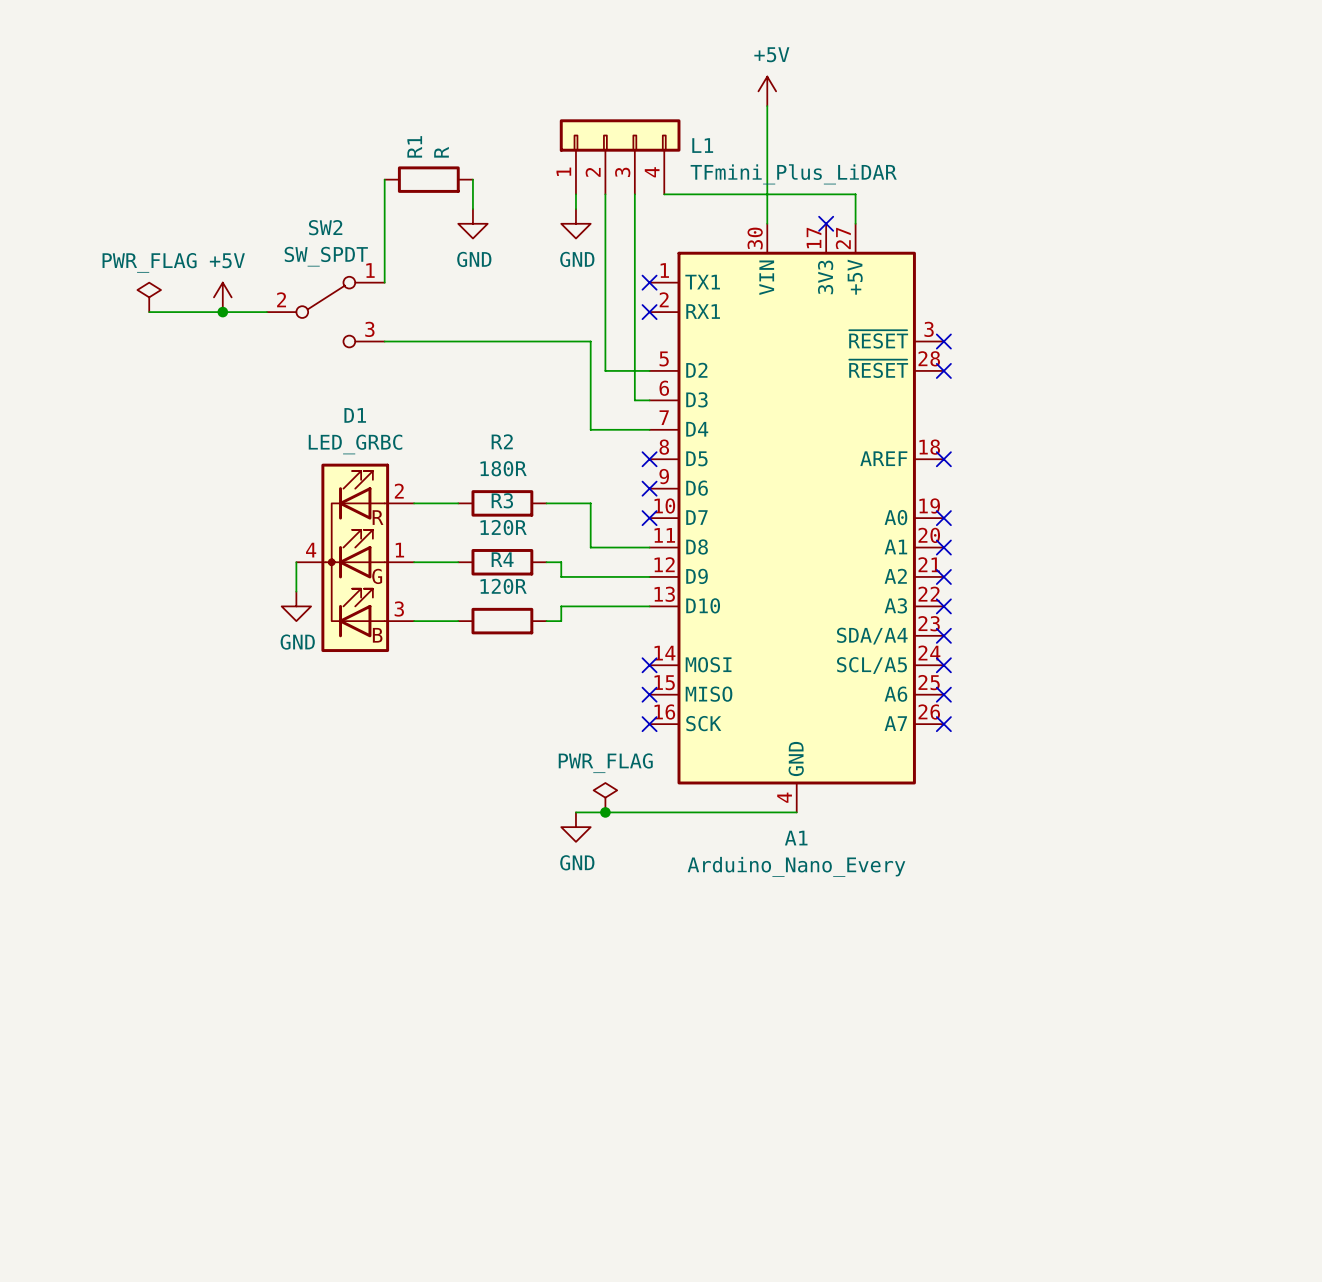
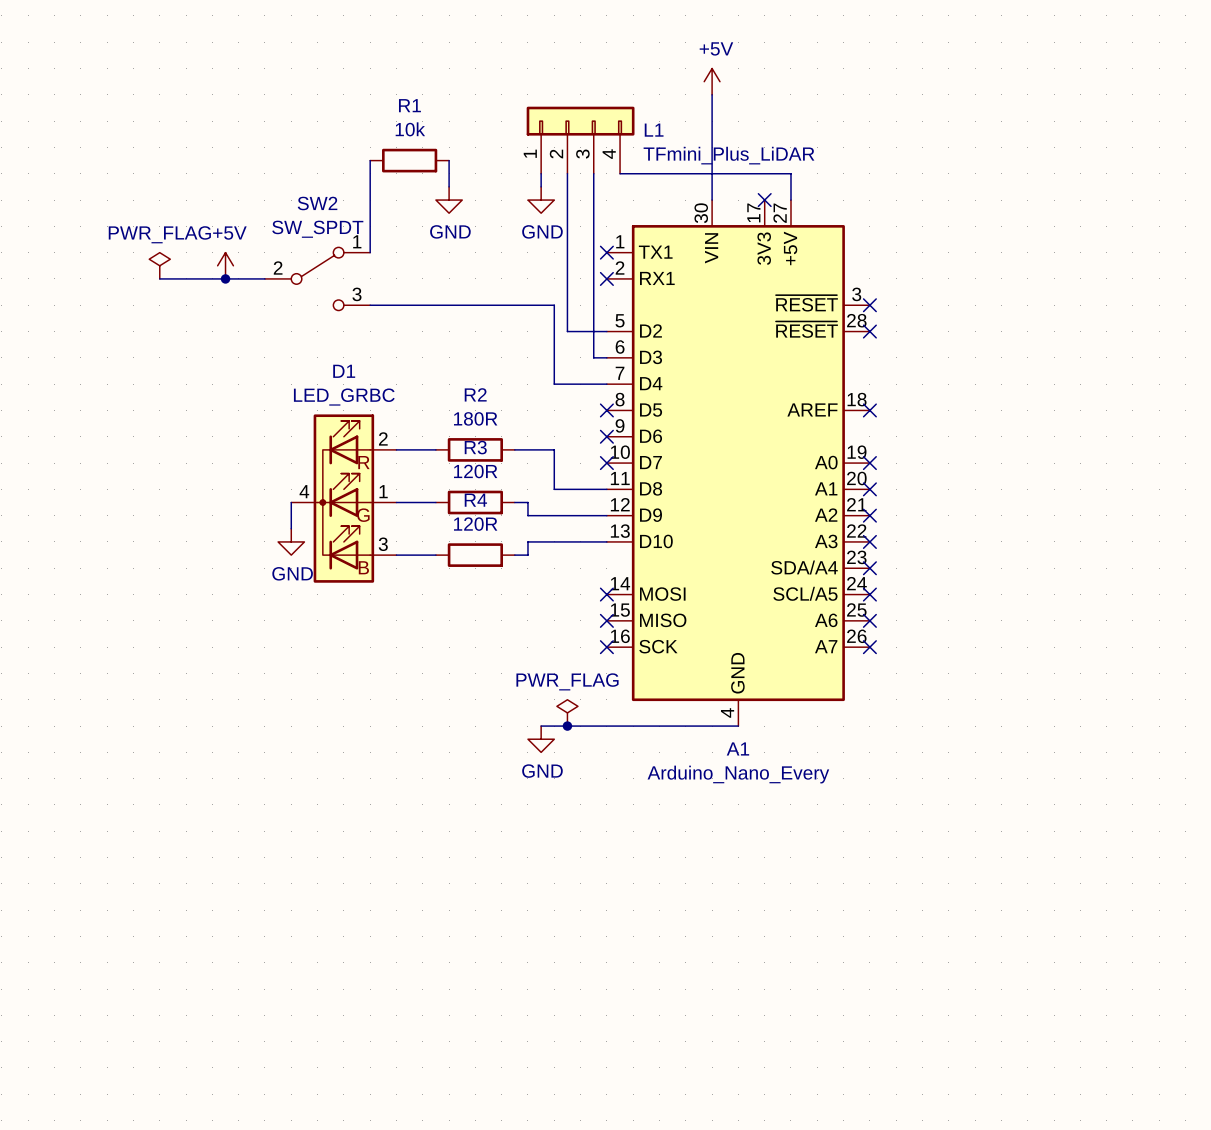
R1 name rotation: 0° (414, 146) -> 90° clockwise (409, 105)
R1 value: R (441, 152) -> 10k (410, 129)

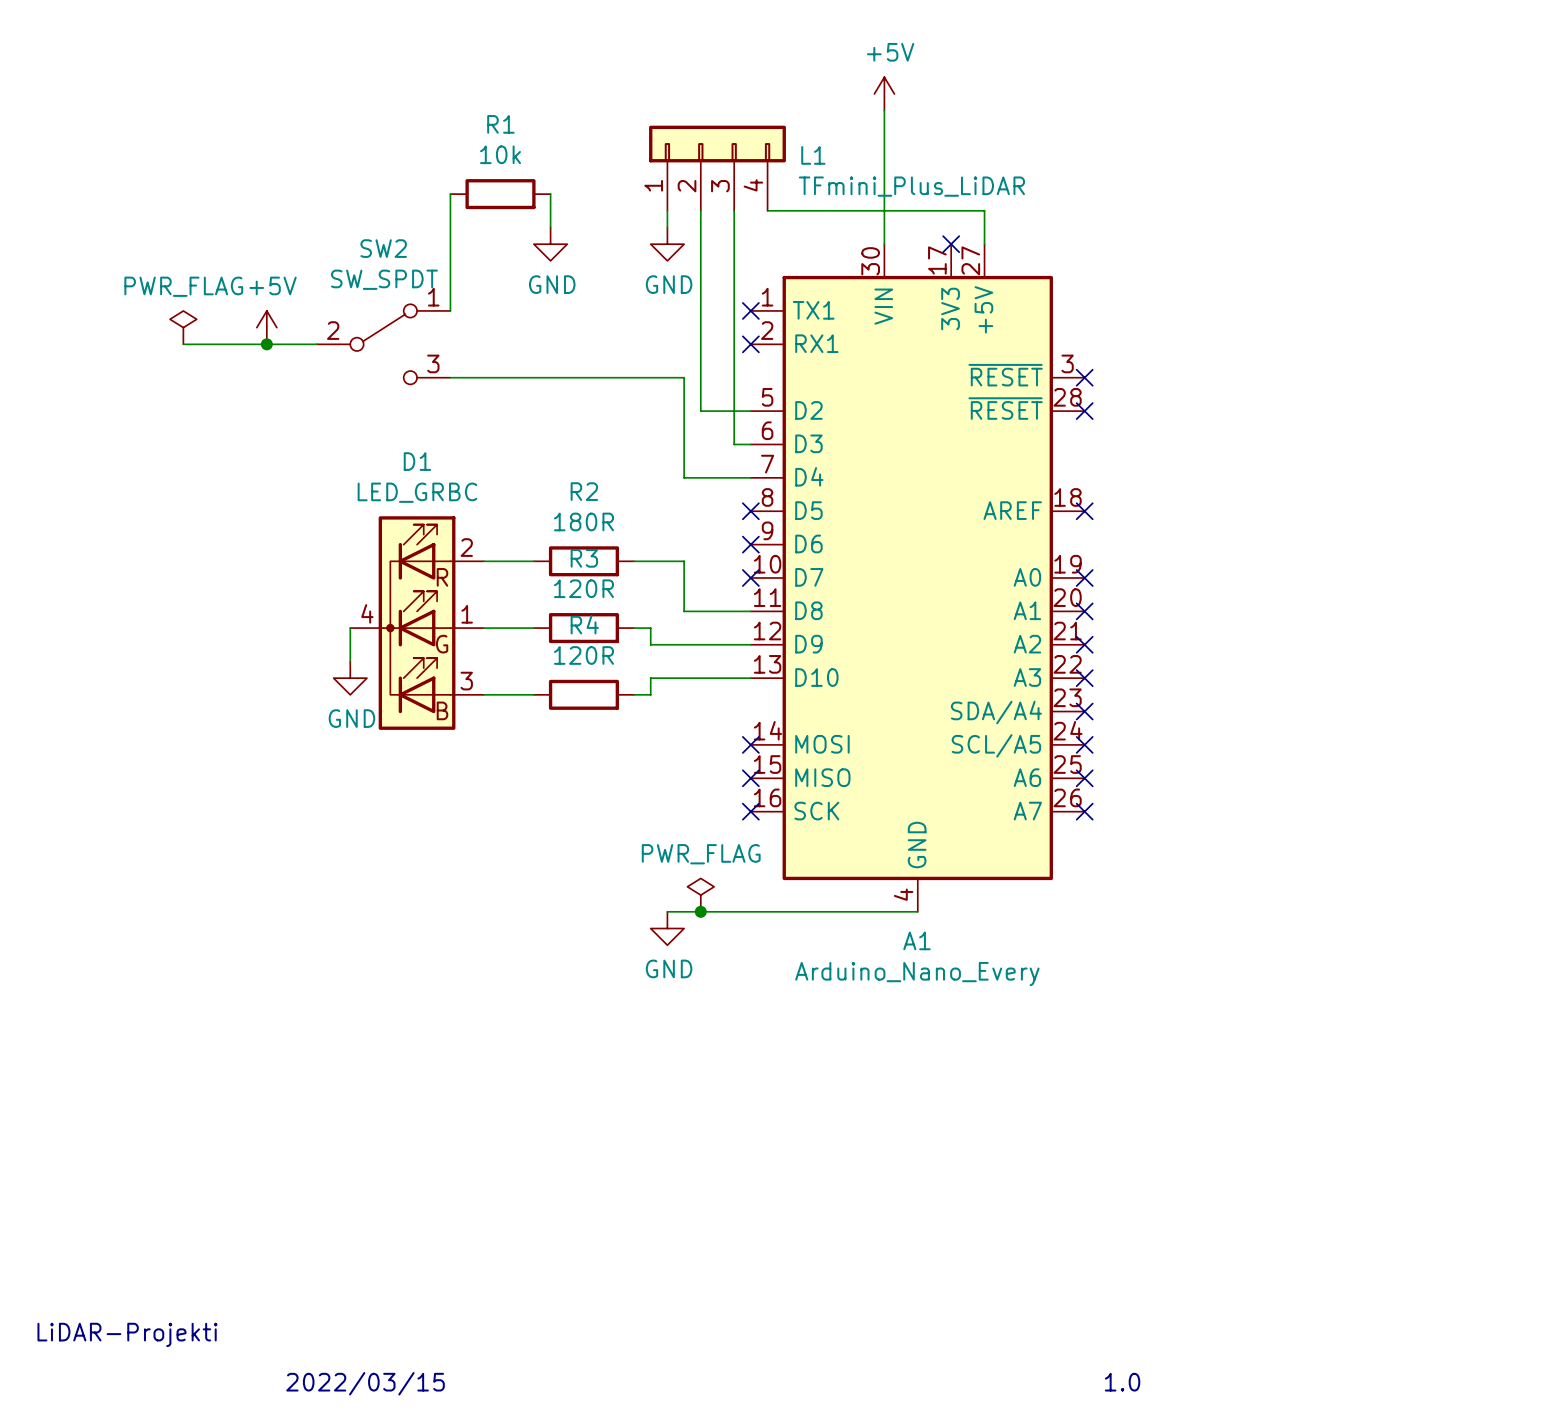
text: none -> LiDAR-Projekti (127, 1334)
text: none -> 2022/03/15 (365, 1383)
text: none -> 1.0 (1122, 1382)

